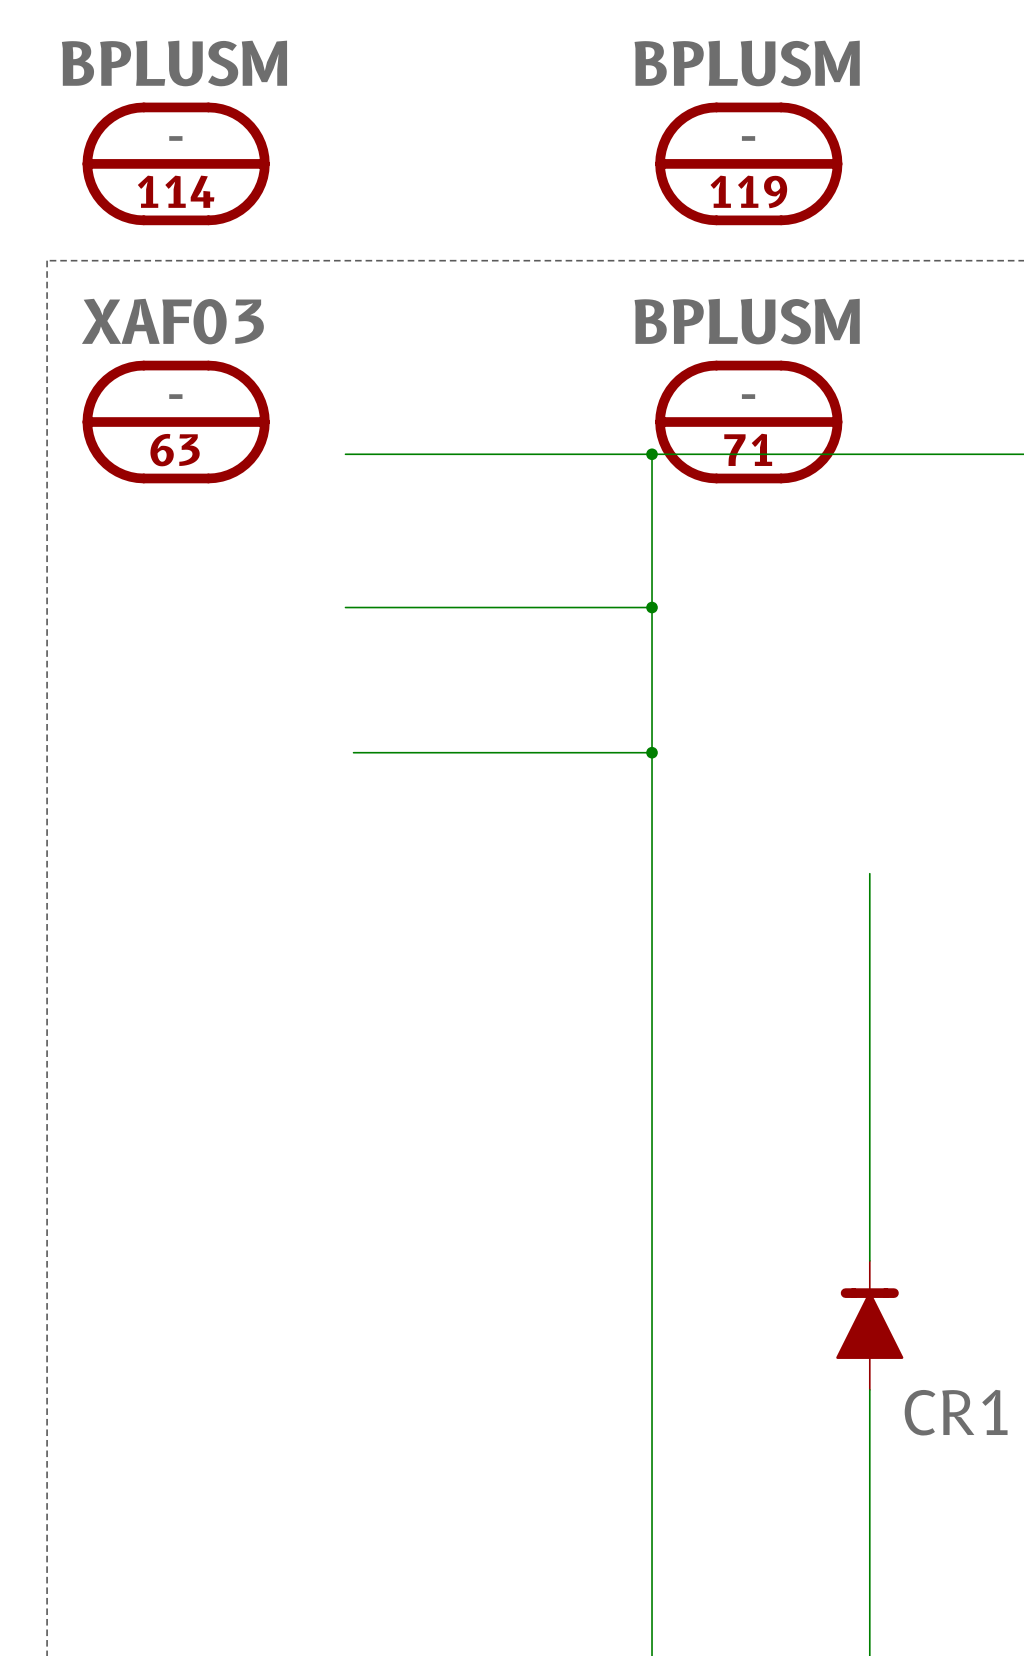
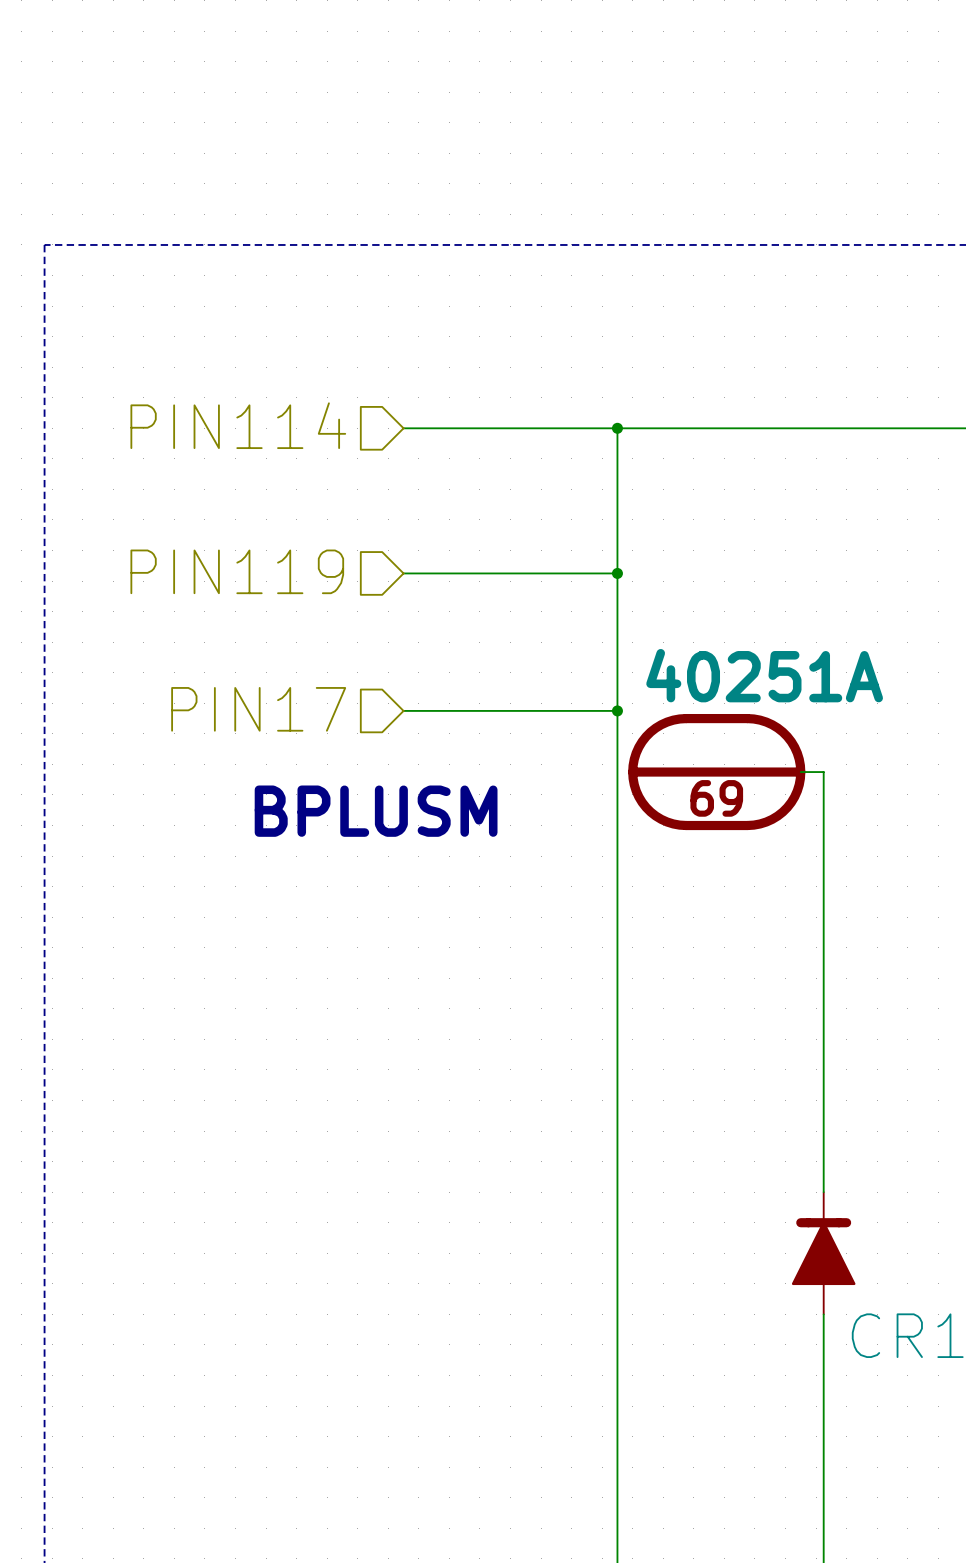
part: (176, 163) -> none
part: (748, 163) -> none
part: (176, 422) -> none
part: (748, 422) -> none
hierarchical label: none -> PIN114 (238, 425)
wire: (345, 454) (426, 454) -> none
hierarchical label: none -> PIN119 (237, 571)
wire: (345, 607) (426, 607) -> none
hierarchical label: none -> PIN17 (258, 709)
wire: (353, 752) (426, 752) -> none
part: none -> (716, 772)
wire: none -> (800, 772) (823, 772) (823, 825)
text: none -> BPLUSM (376, 811)

